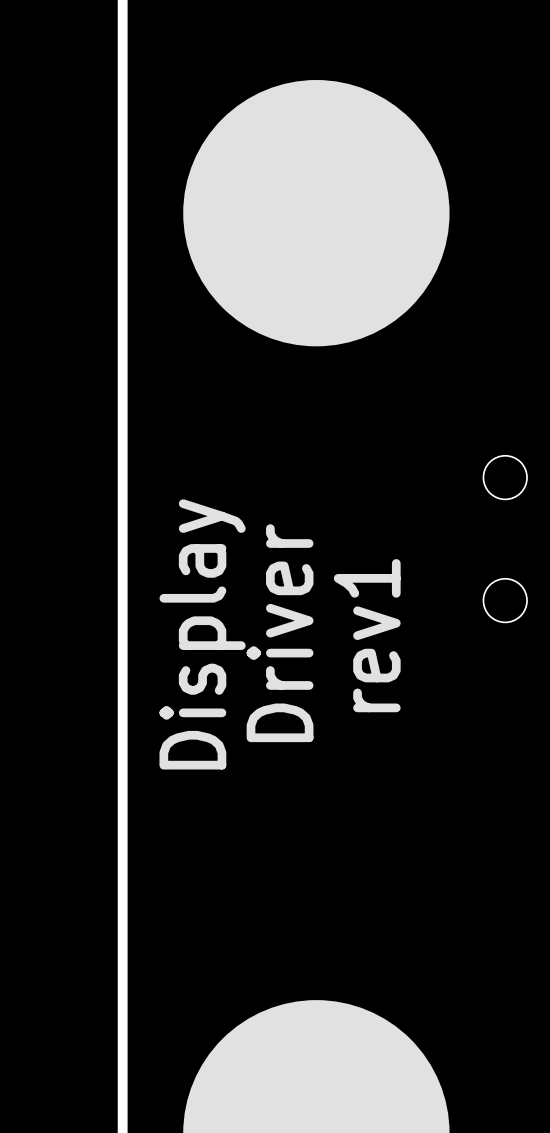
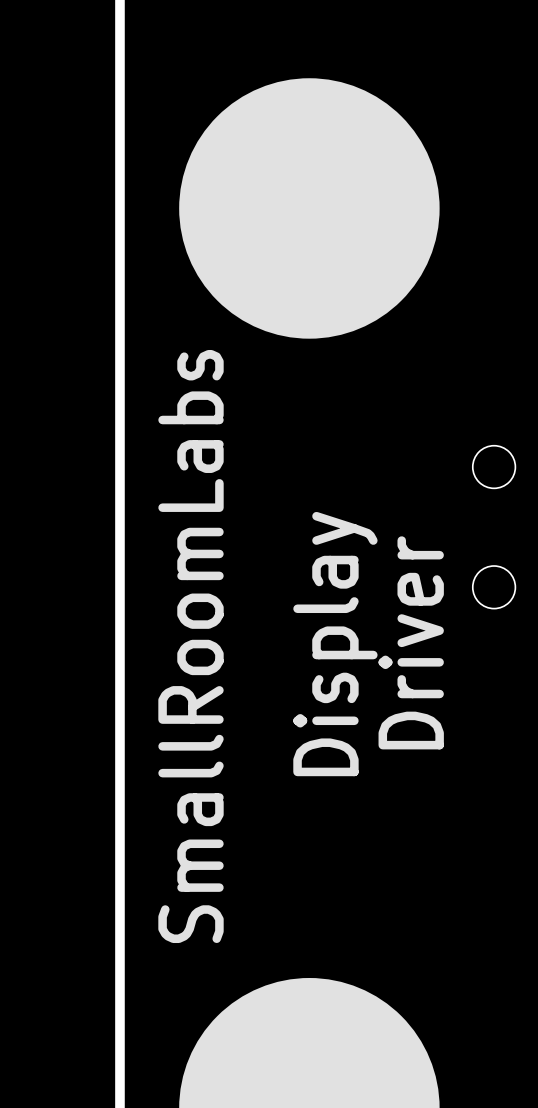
text position: Driver (280, 633) -> Driver (411, 642)
text position: Display (202, 634) -> Display (335, 644)
text: rev1 (367, 635) -> none
text: none -> SmallRoomLabs (191, 646)

